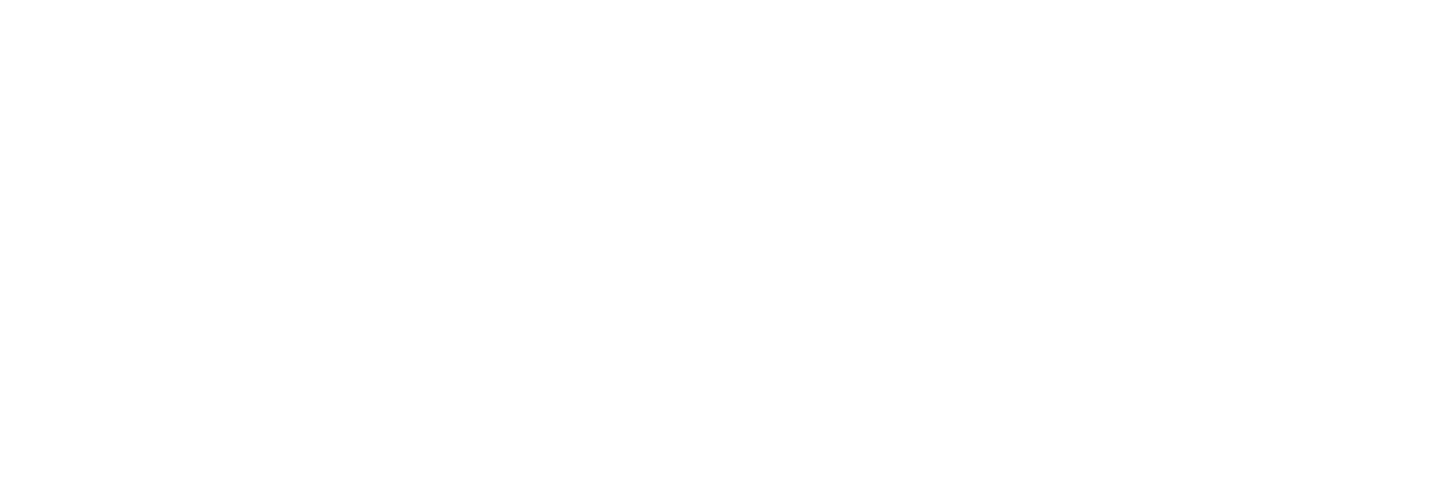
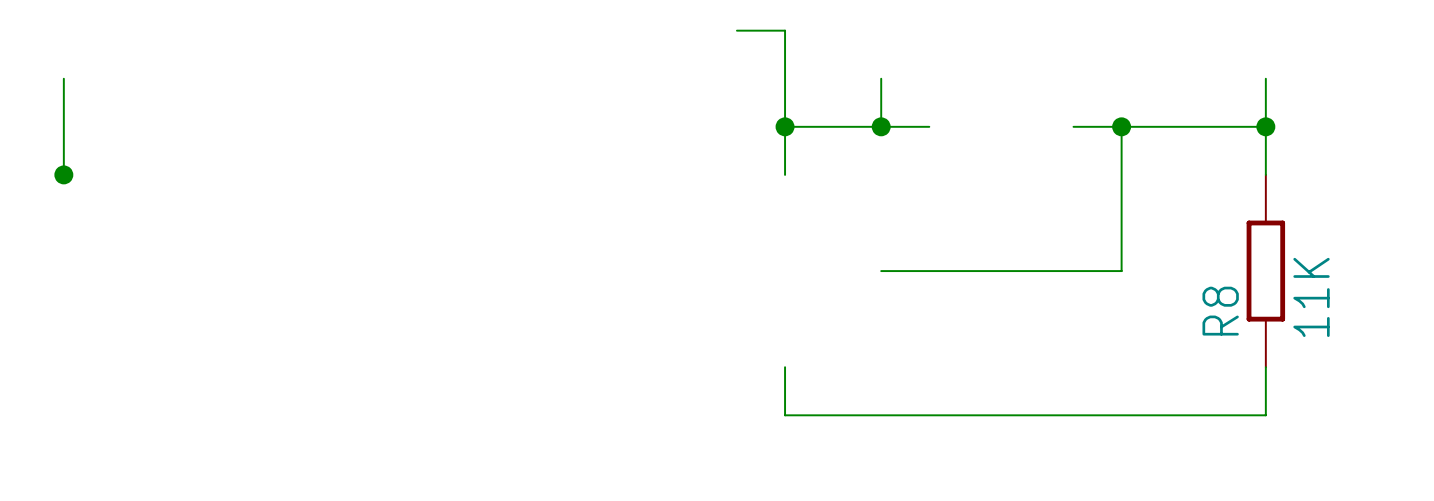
wire: none -> (736, 30) (785, 30) (785, 174)
wire: none -> (63, 78) (63, 174)
wire: none -> (881, 78) (881, 126)
wire: none -> (1265, 78) (1265, 174)
wire: none -> (785, 126) (929, 126)
junction: none -> (785, 126)
junction: none -> (881, 126)
wire: none -> (1073, 126) (1265, 126)
wire: none -> (1121, 126) (1121, 271) (881, 271)
junction: none -> (1121, 126)
junction: none -> (1265, 126)
junction: none -> (63, 174)
R8: none -> 11K (1265, 271)
wire: none -> (785, 367) (785, 415) (1265, 415) (1265, 367)

